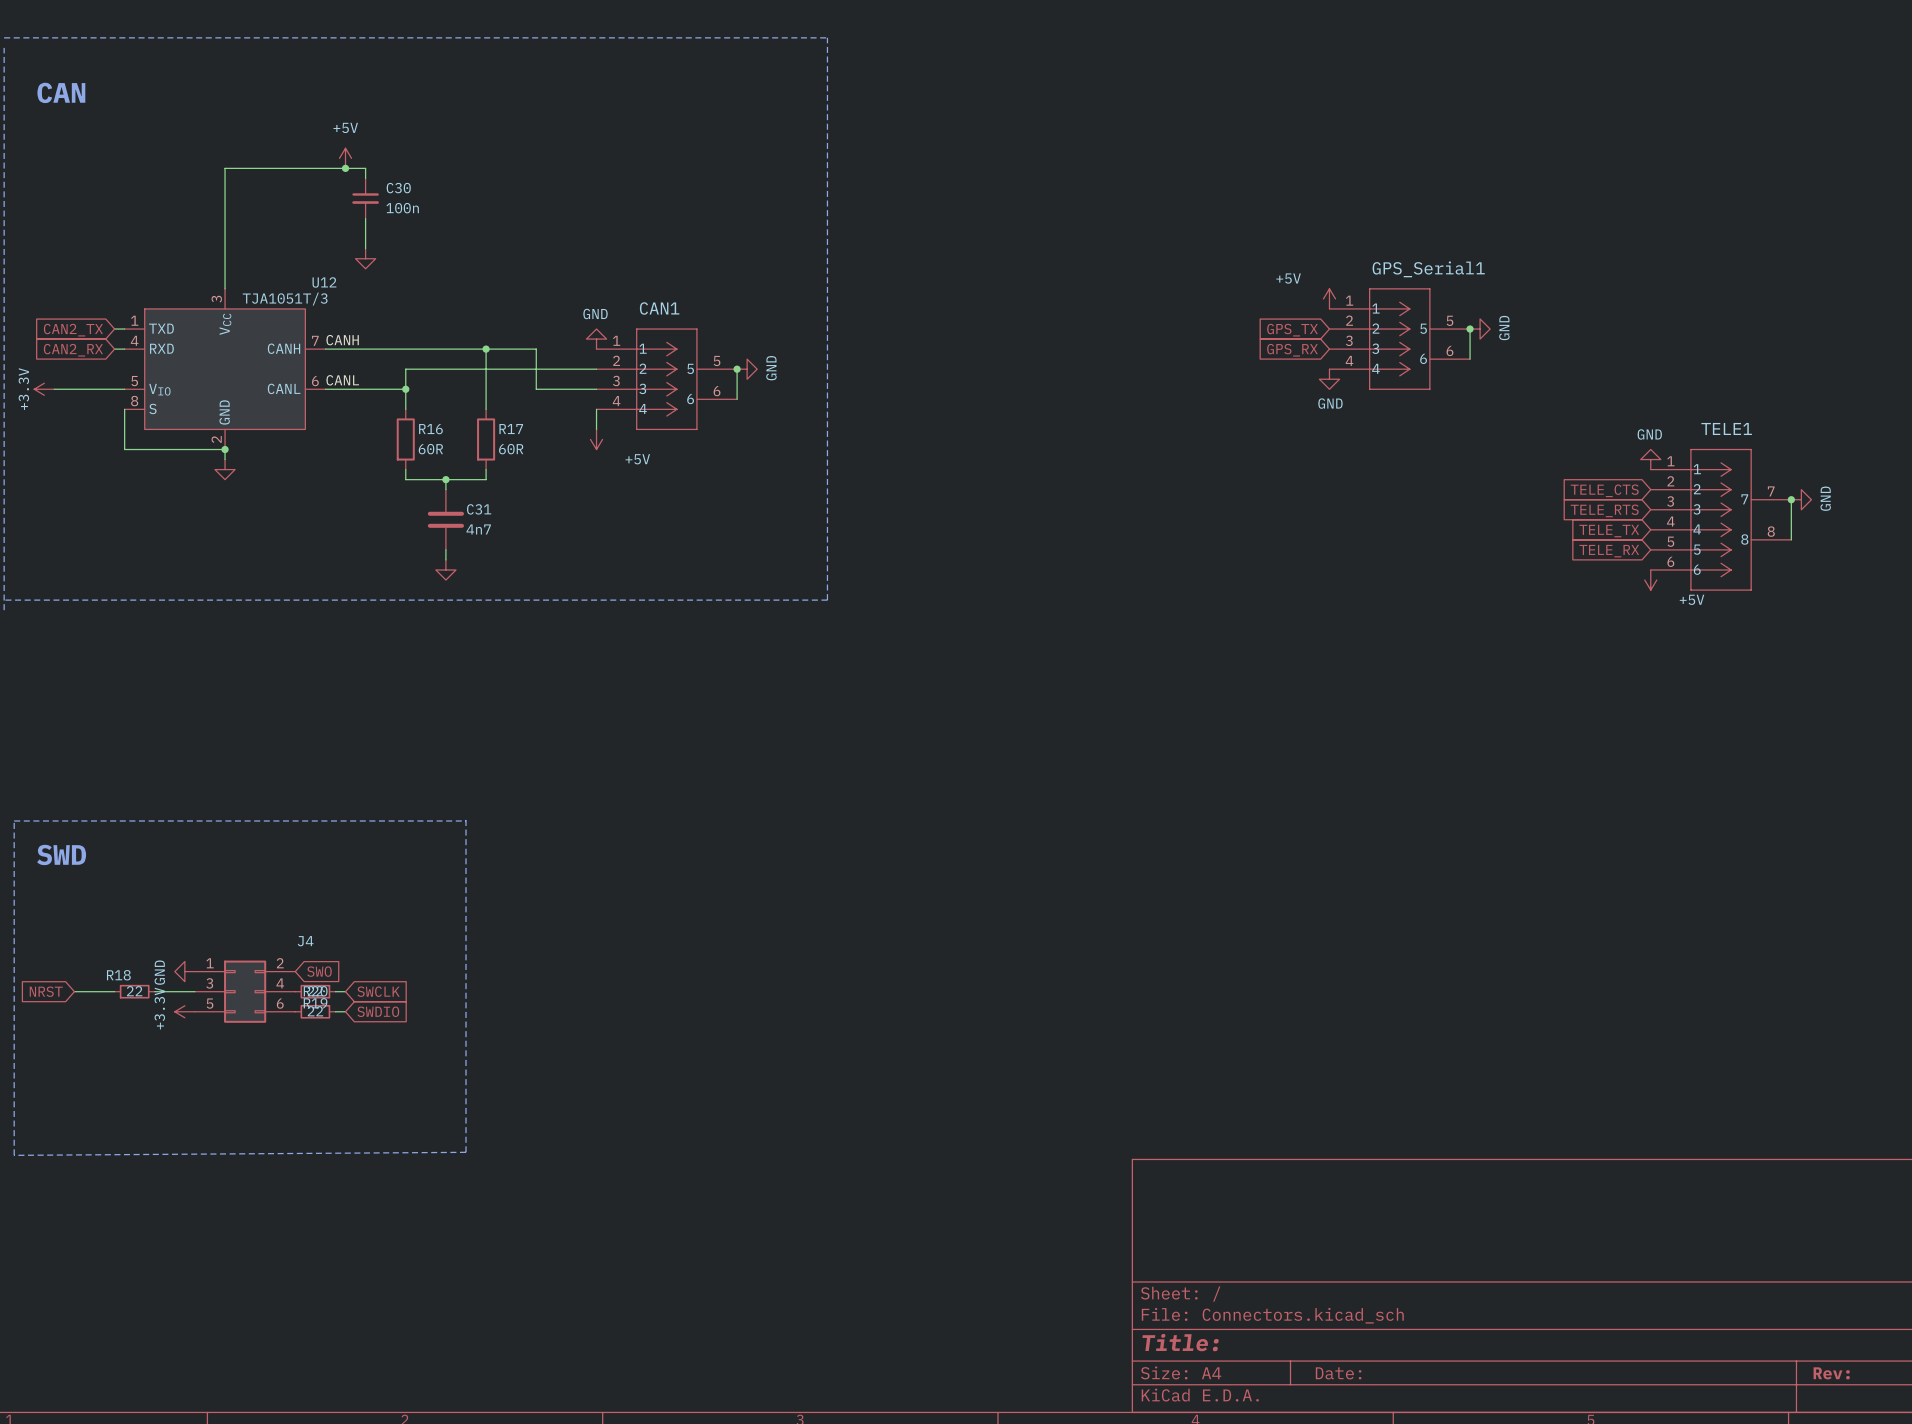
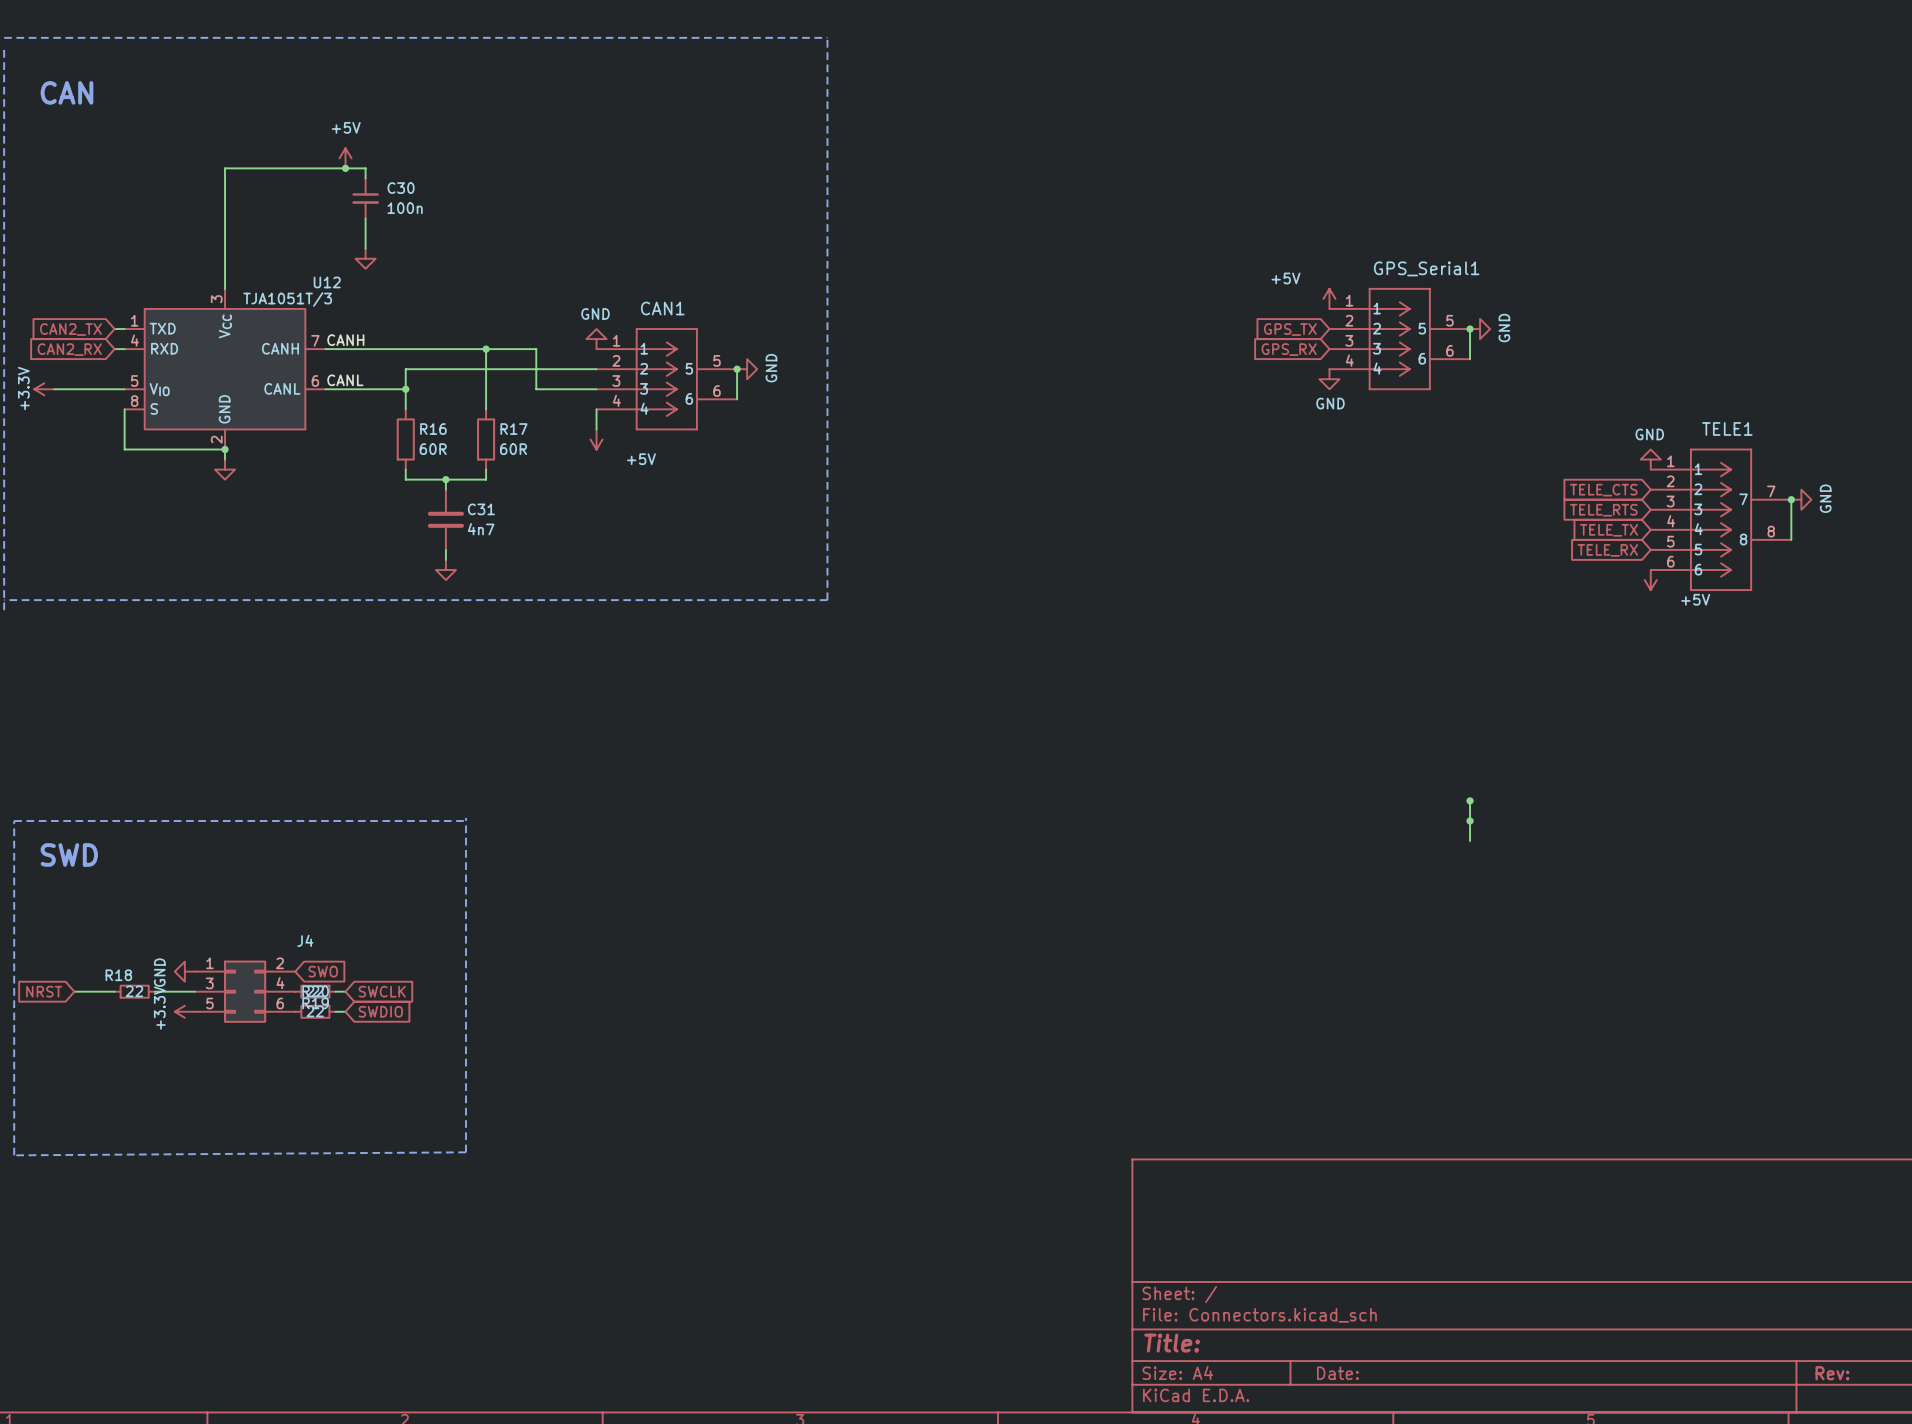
wire: none -> (1470, 800) (1470, 841)
junction: none -> (1470, 800)
junction: none -> (1470, 821)

